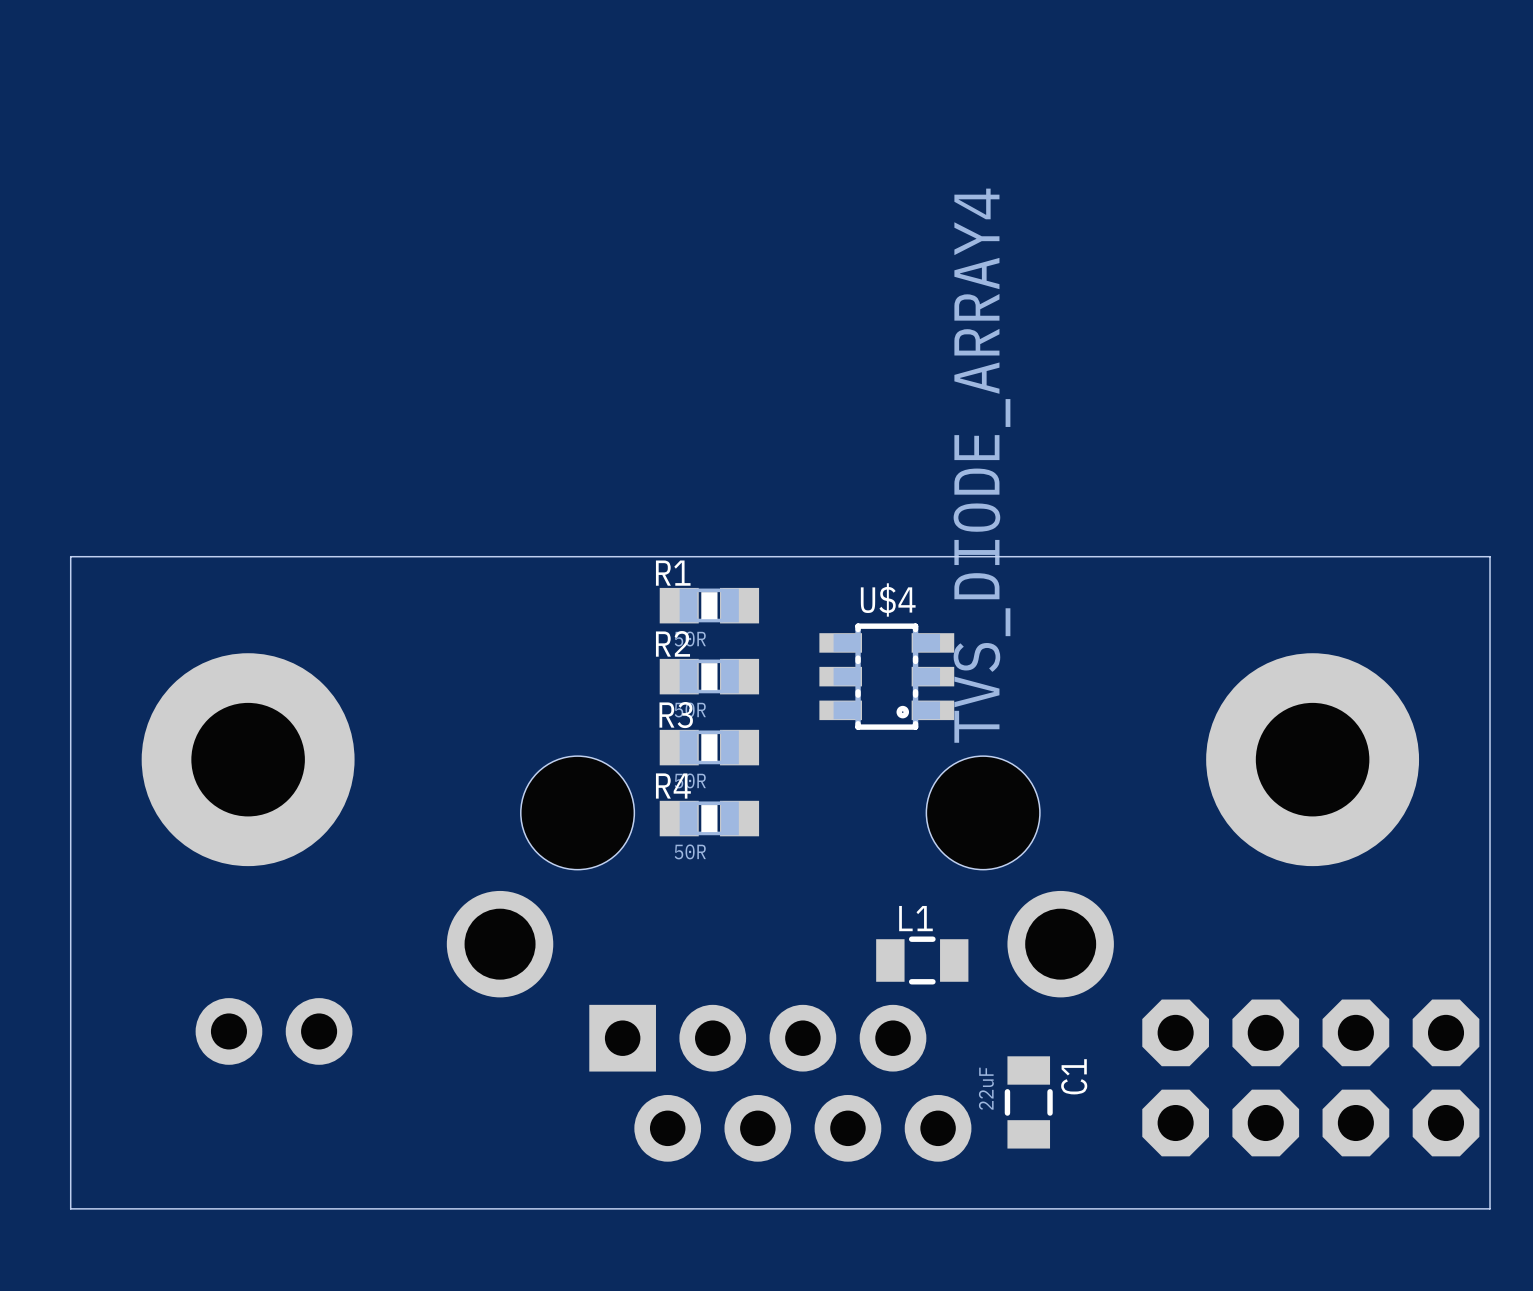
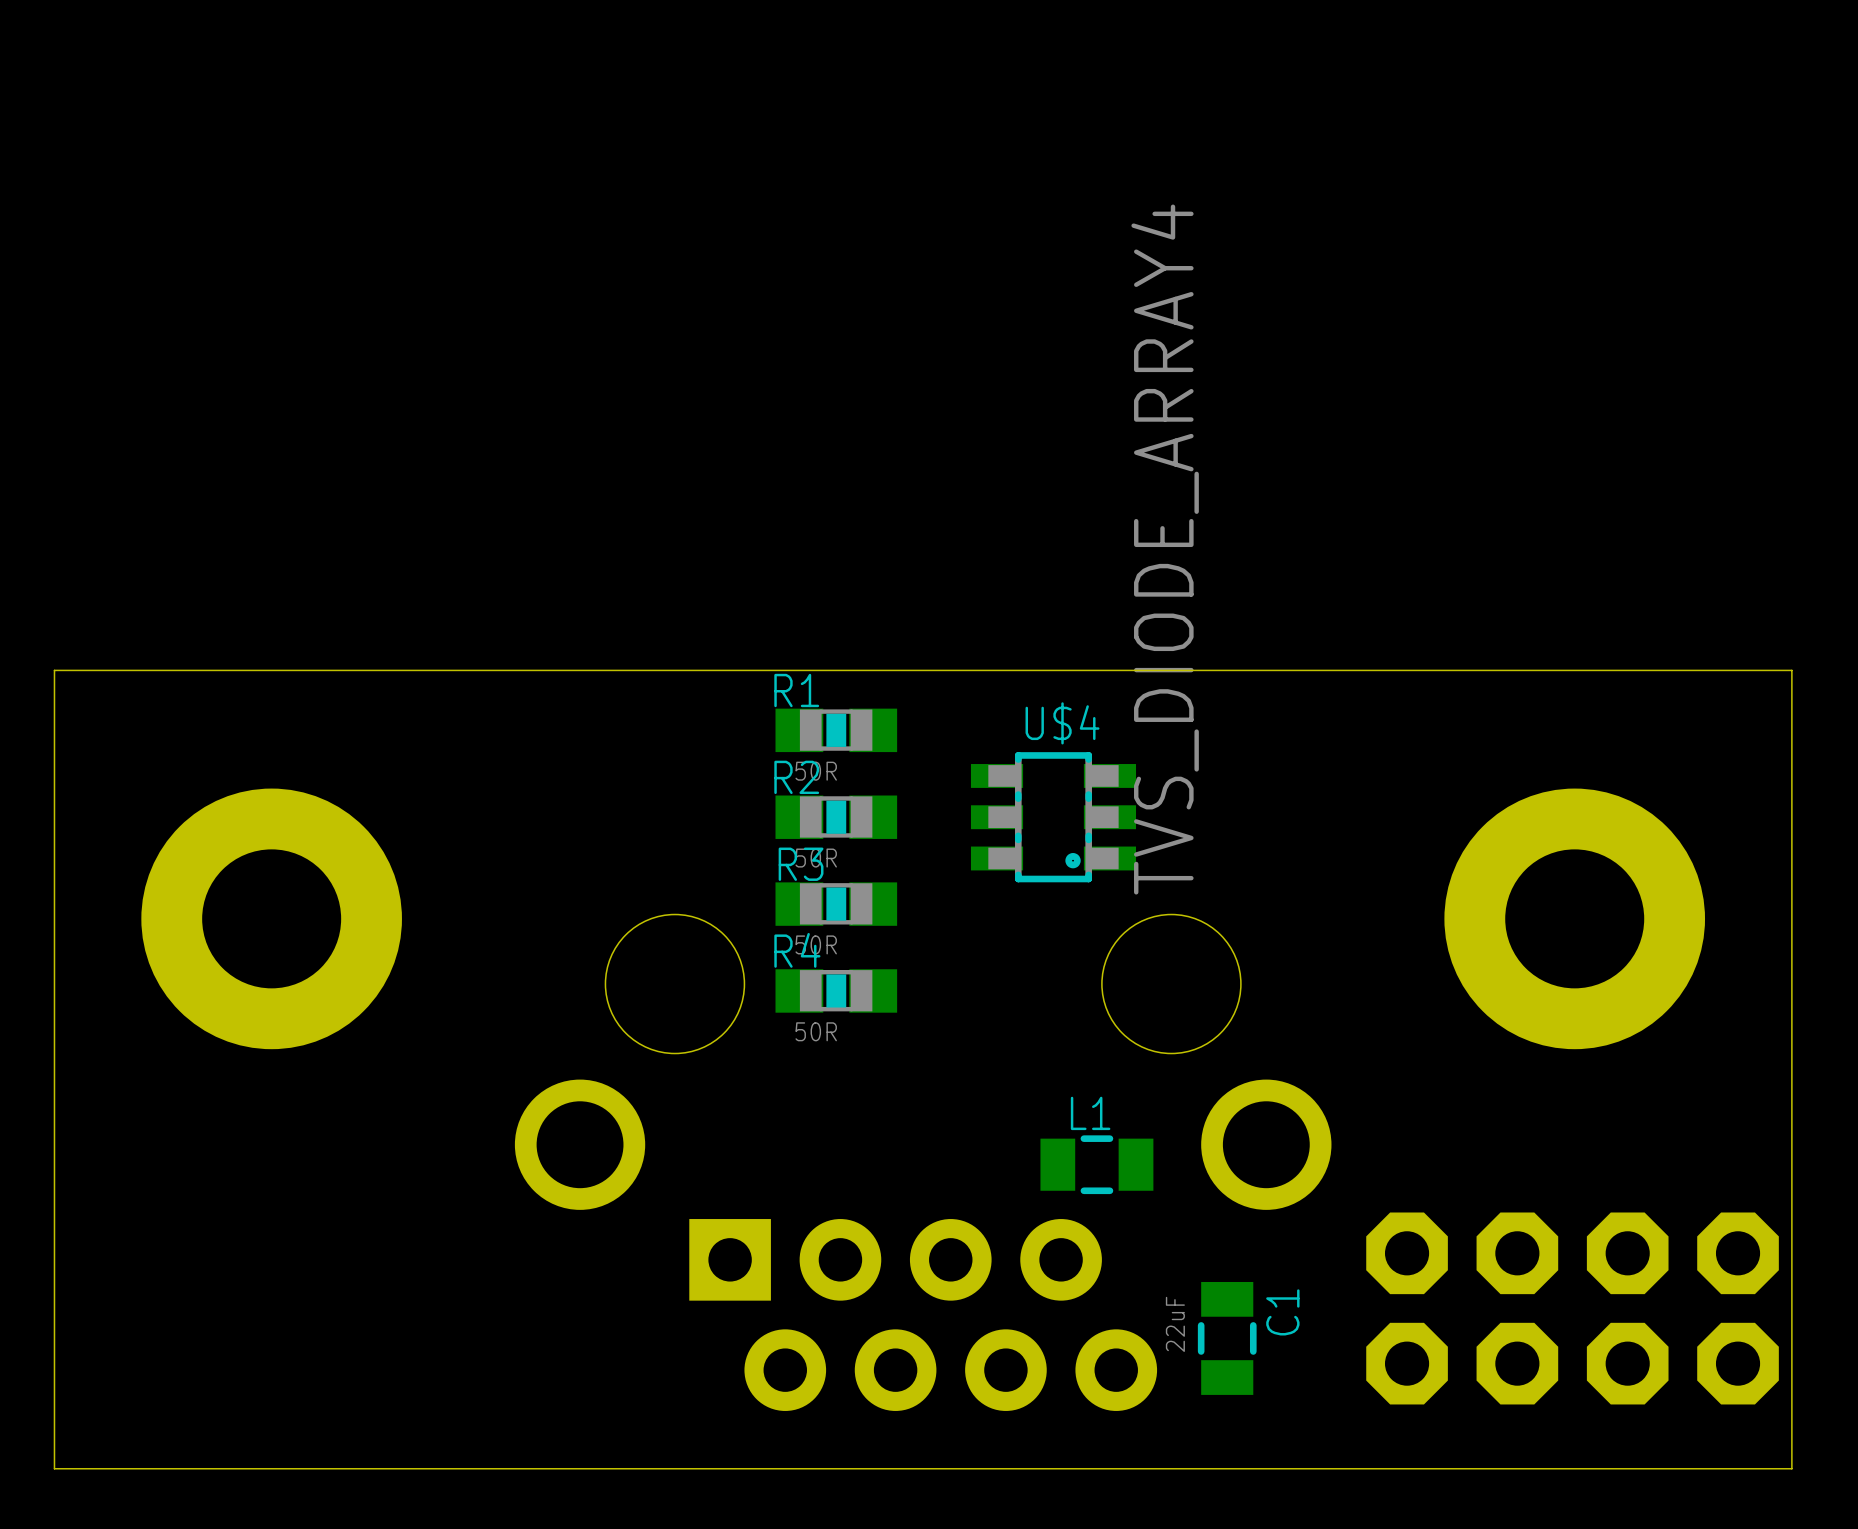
part: (274, 1031) -> none

